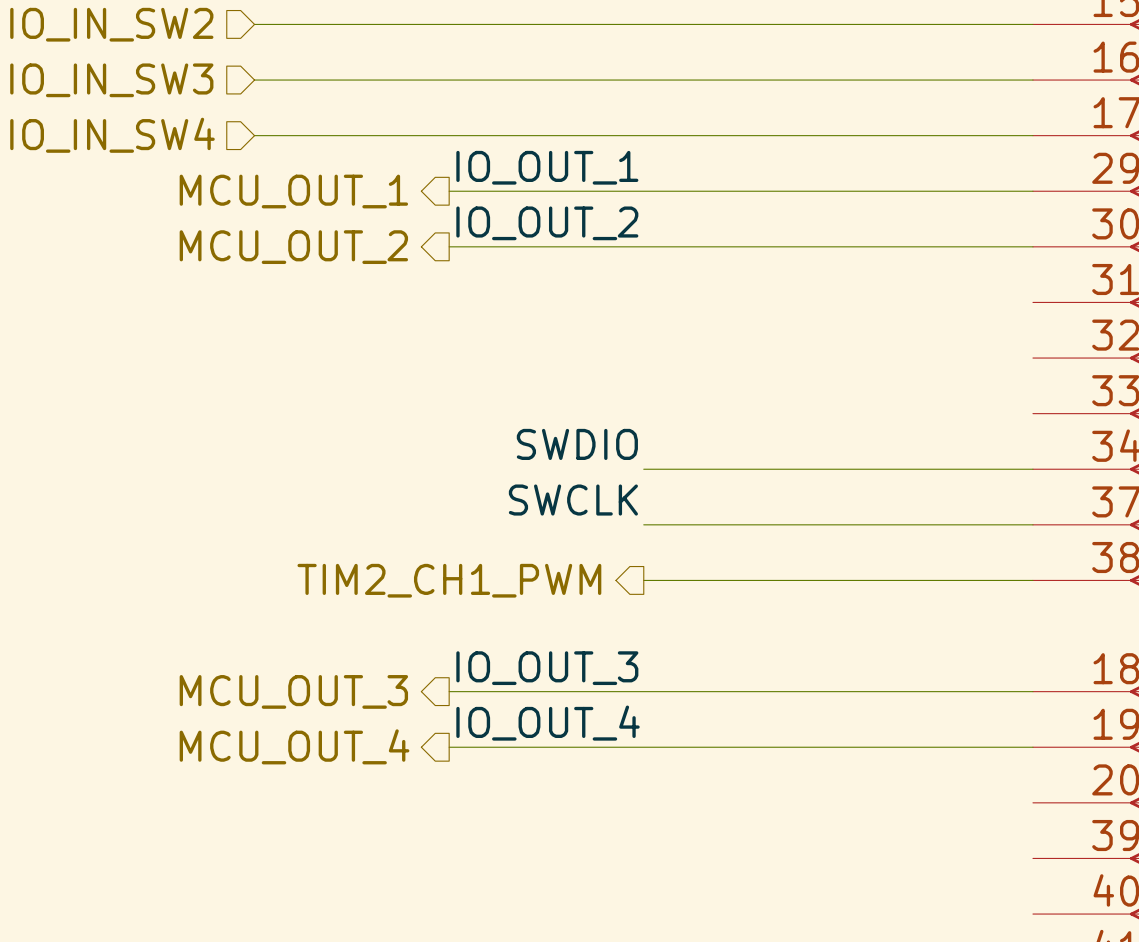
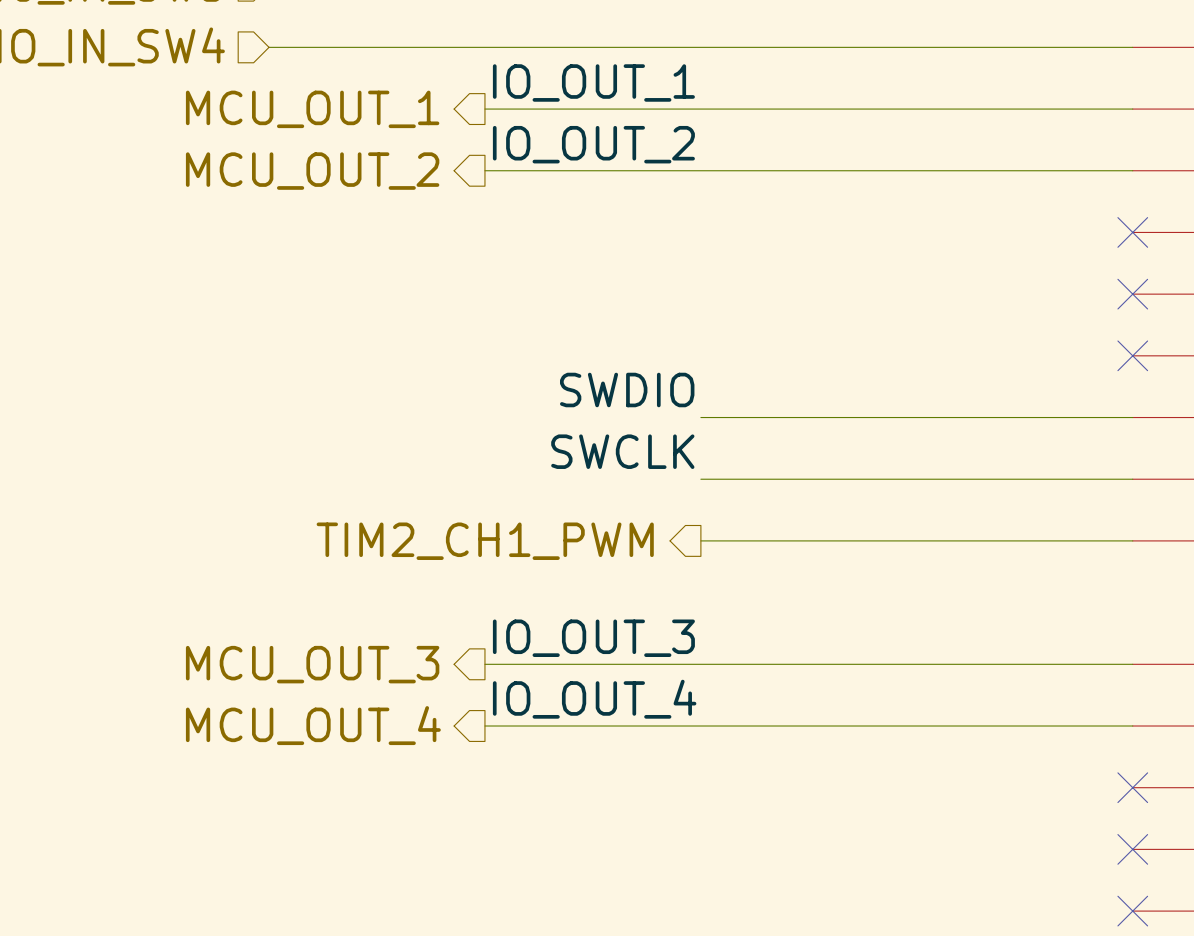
no-connect mark: none -> (1132, 232)
no-connect mark: none -> (1132, 294)
no-connect mark: none -> (1132, 355)
no-connect mark: none -> (1132, 787)
no-connect mark: none -> (1132, 849)
no-connect mark: none -> (1132, 911)

